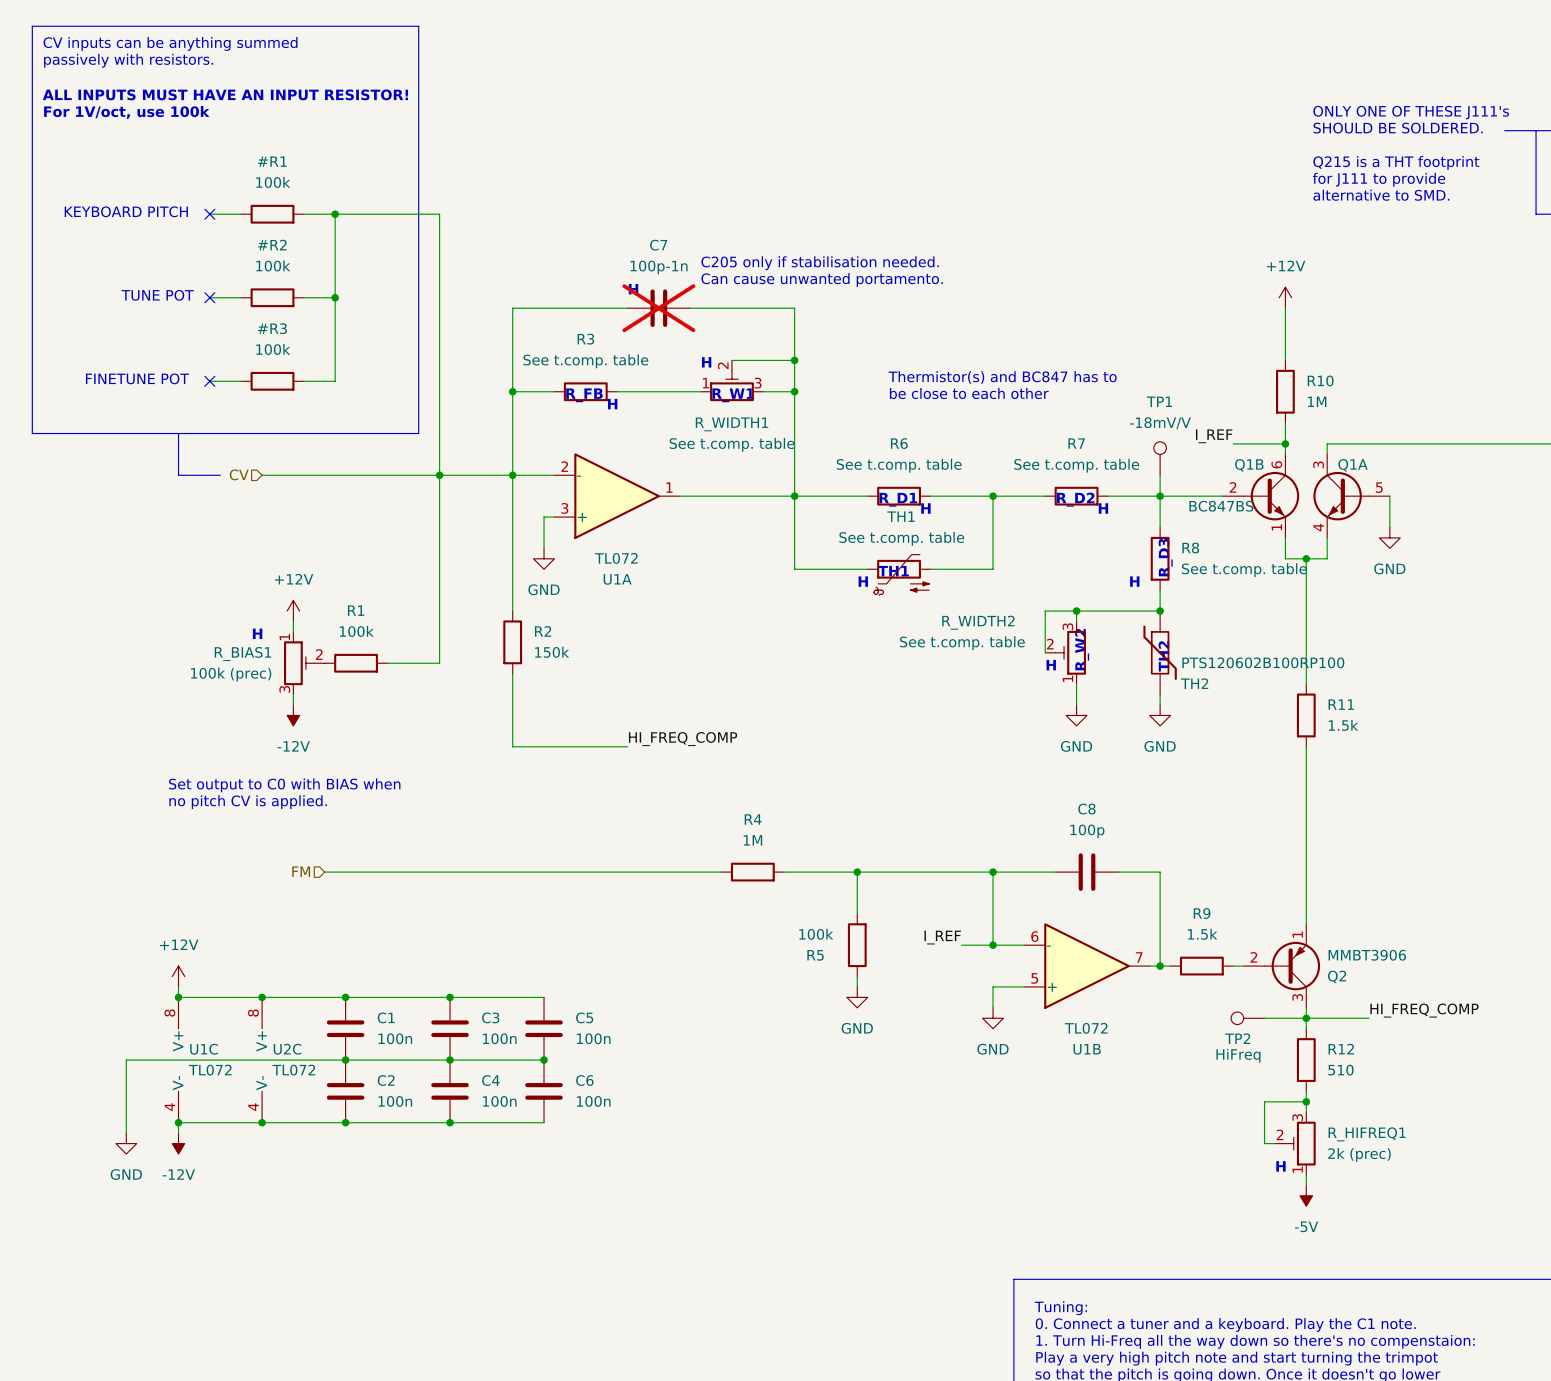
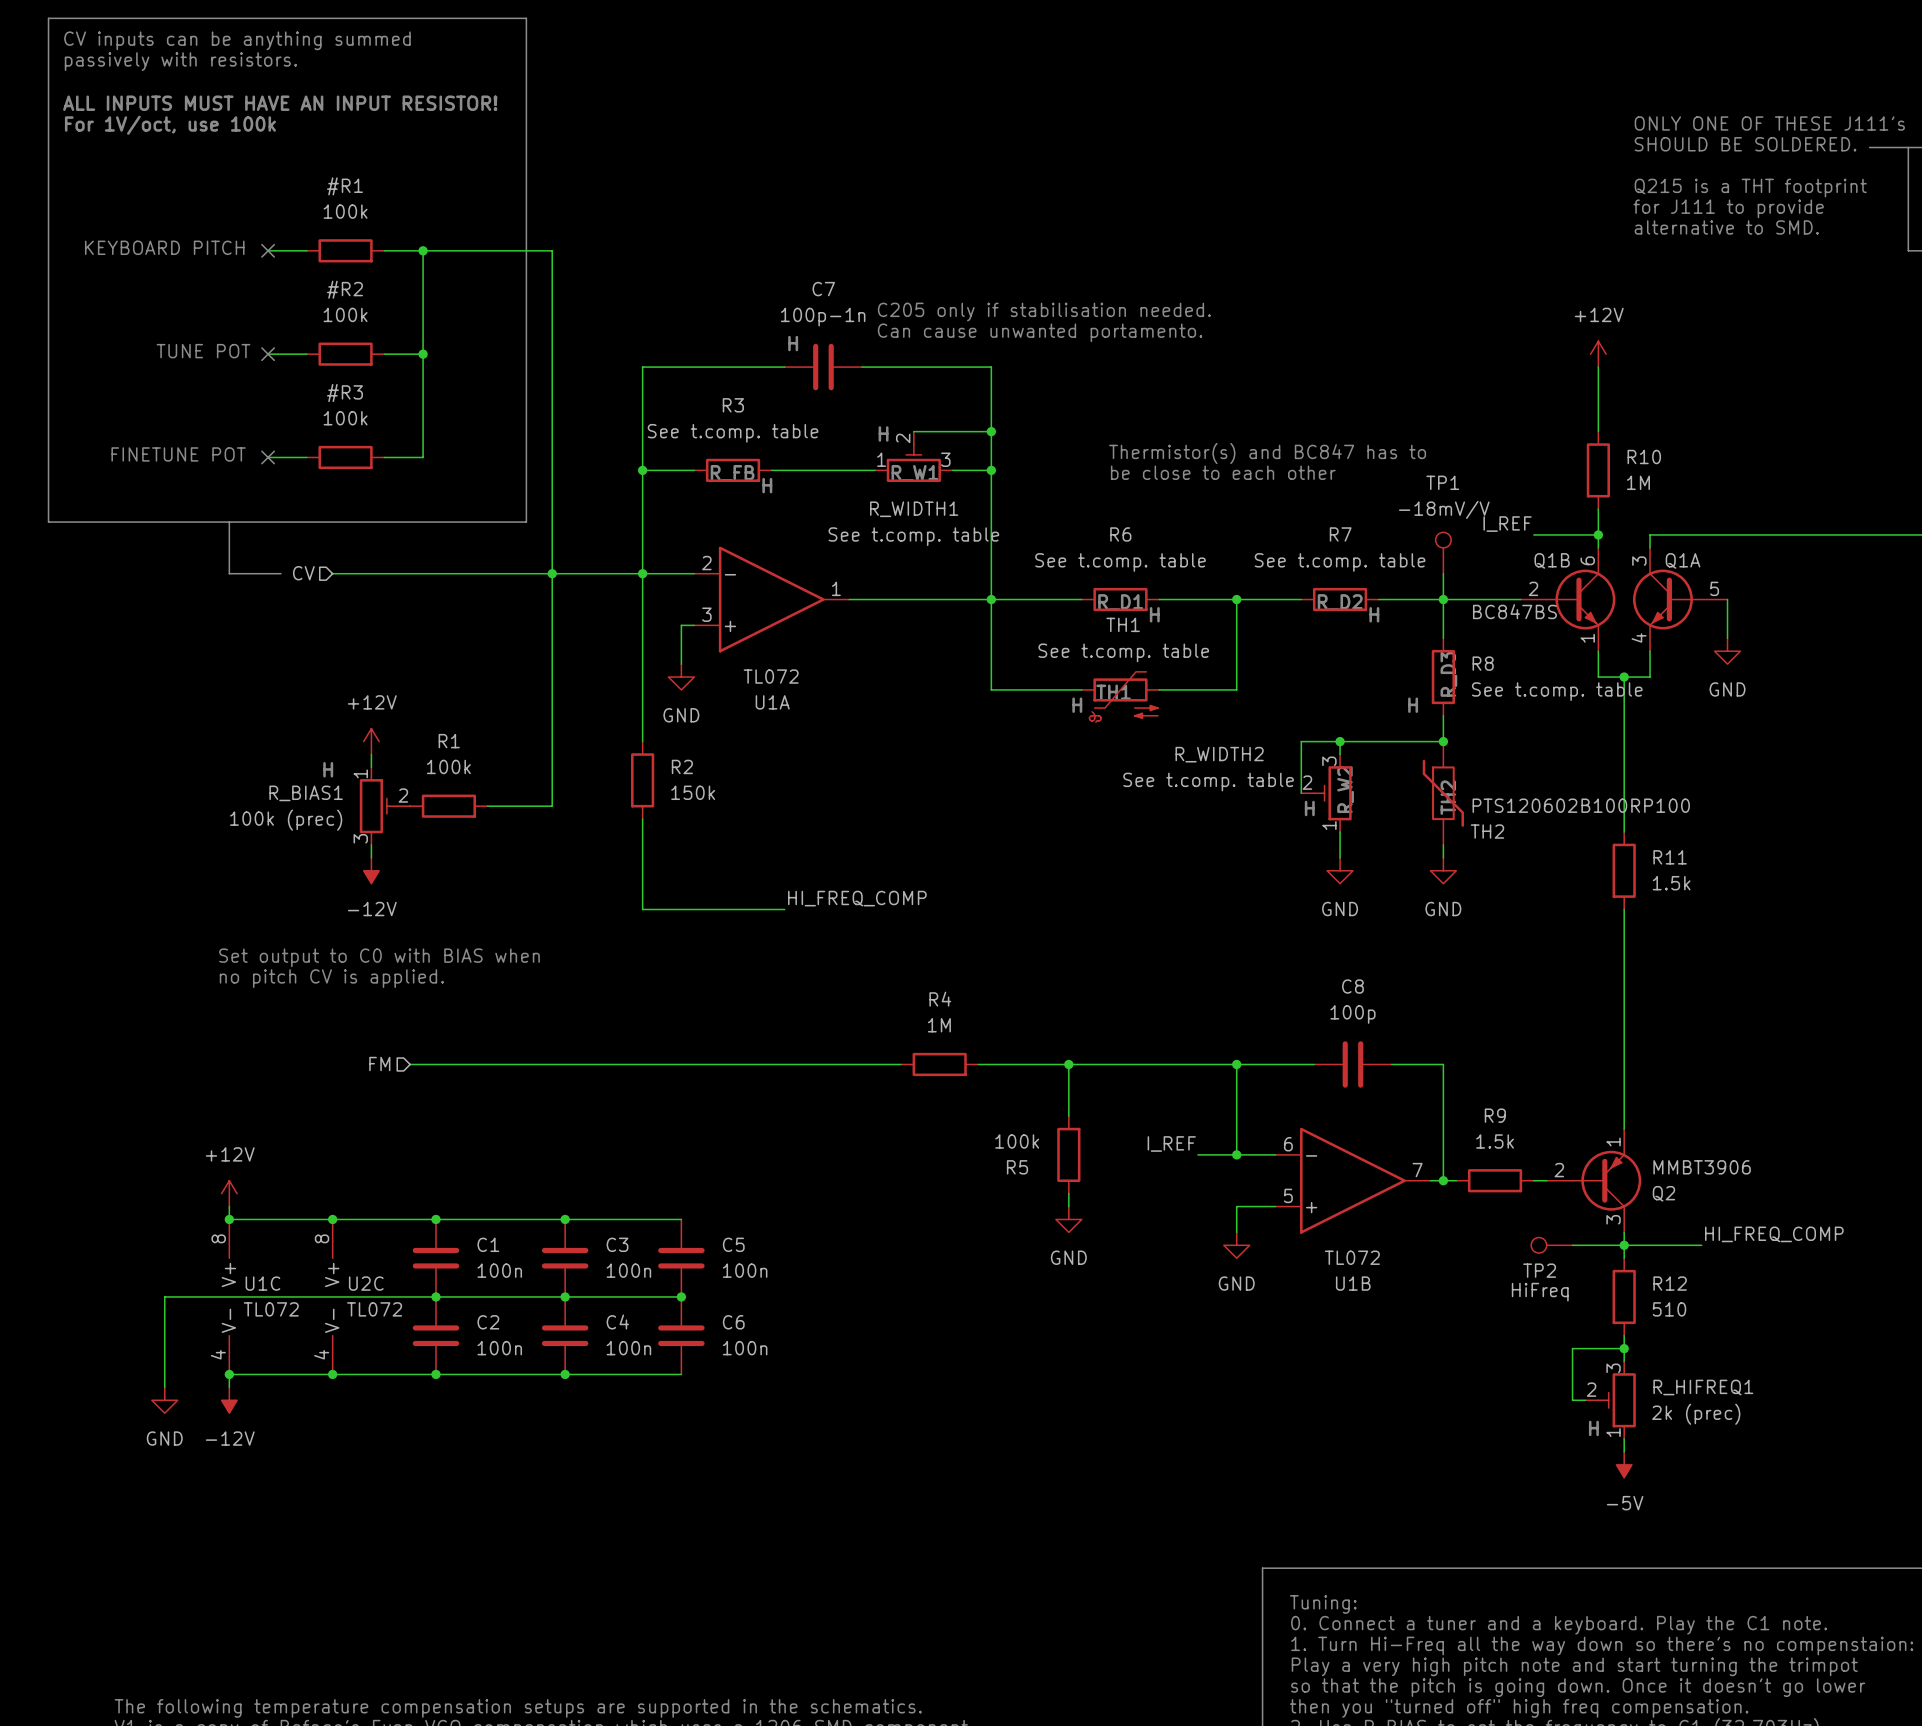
C7 do-not-place cross: (658, 308) -> none

